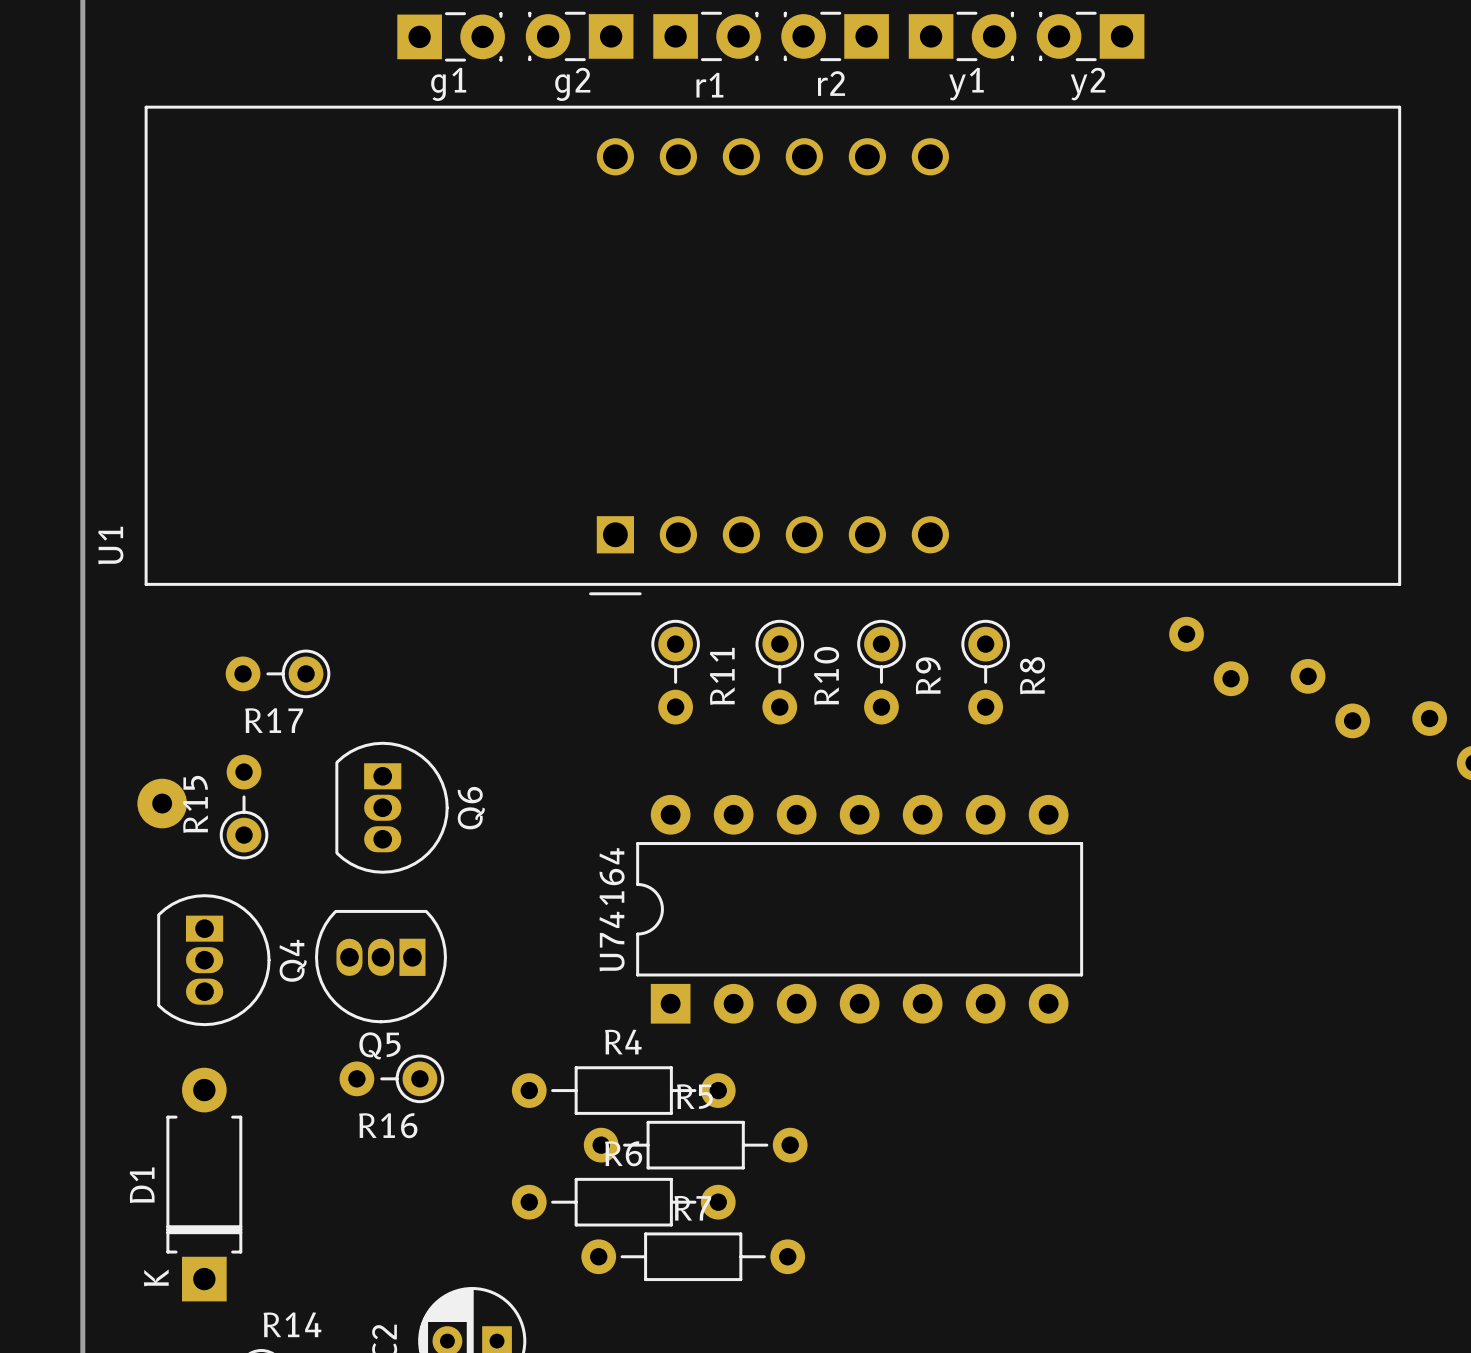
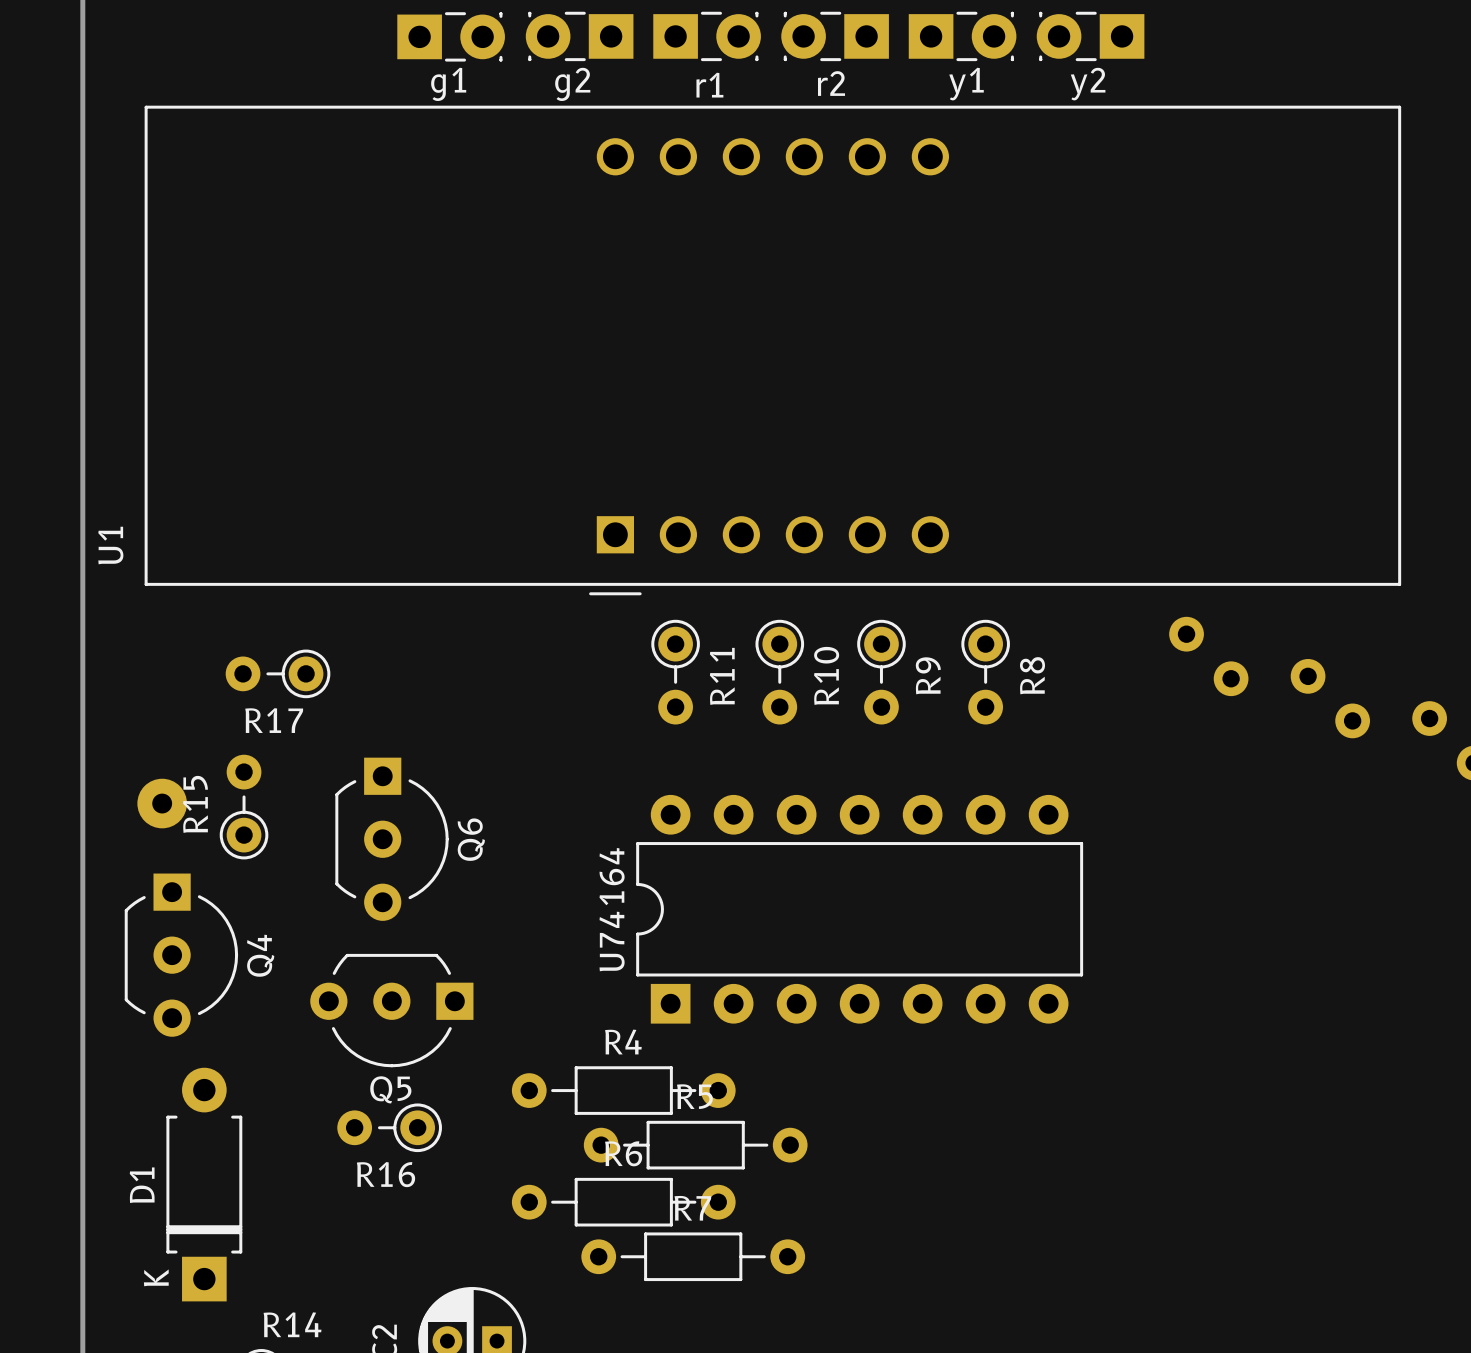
Q6 footprint: [335, 741, 449, 874] -> [335, 757, 449, 921]
Q4 footprint: [157, 894, 271, 1027] -> [124, 873, 239, 1037]
Q5 footprint: [315, 909, 447, 1024] -> [310, 953, 474, 1068]
R16 position: (391, 1078) -> (389, 1127)

